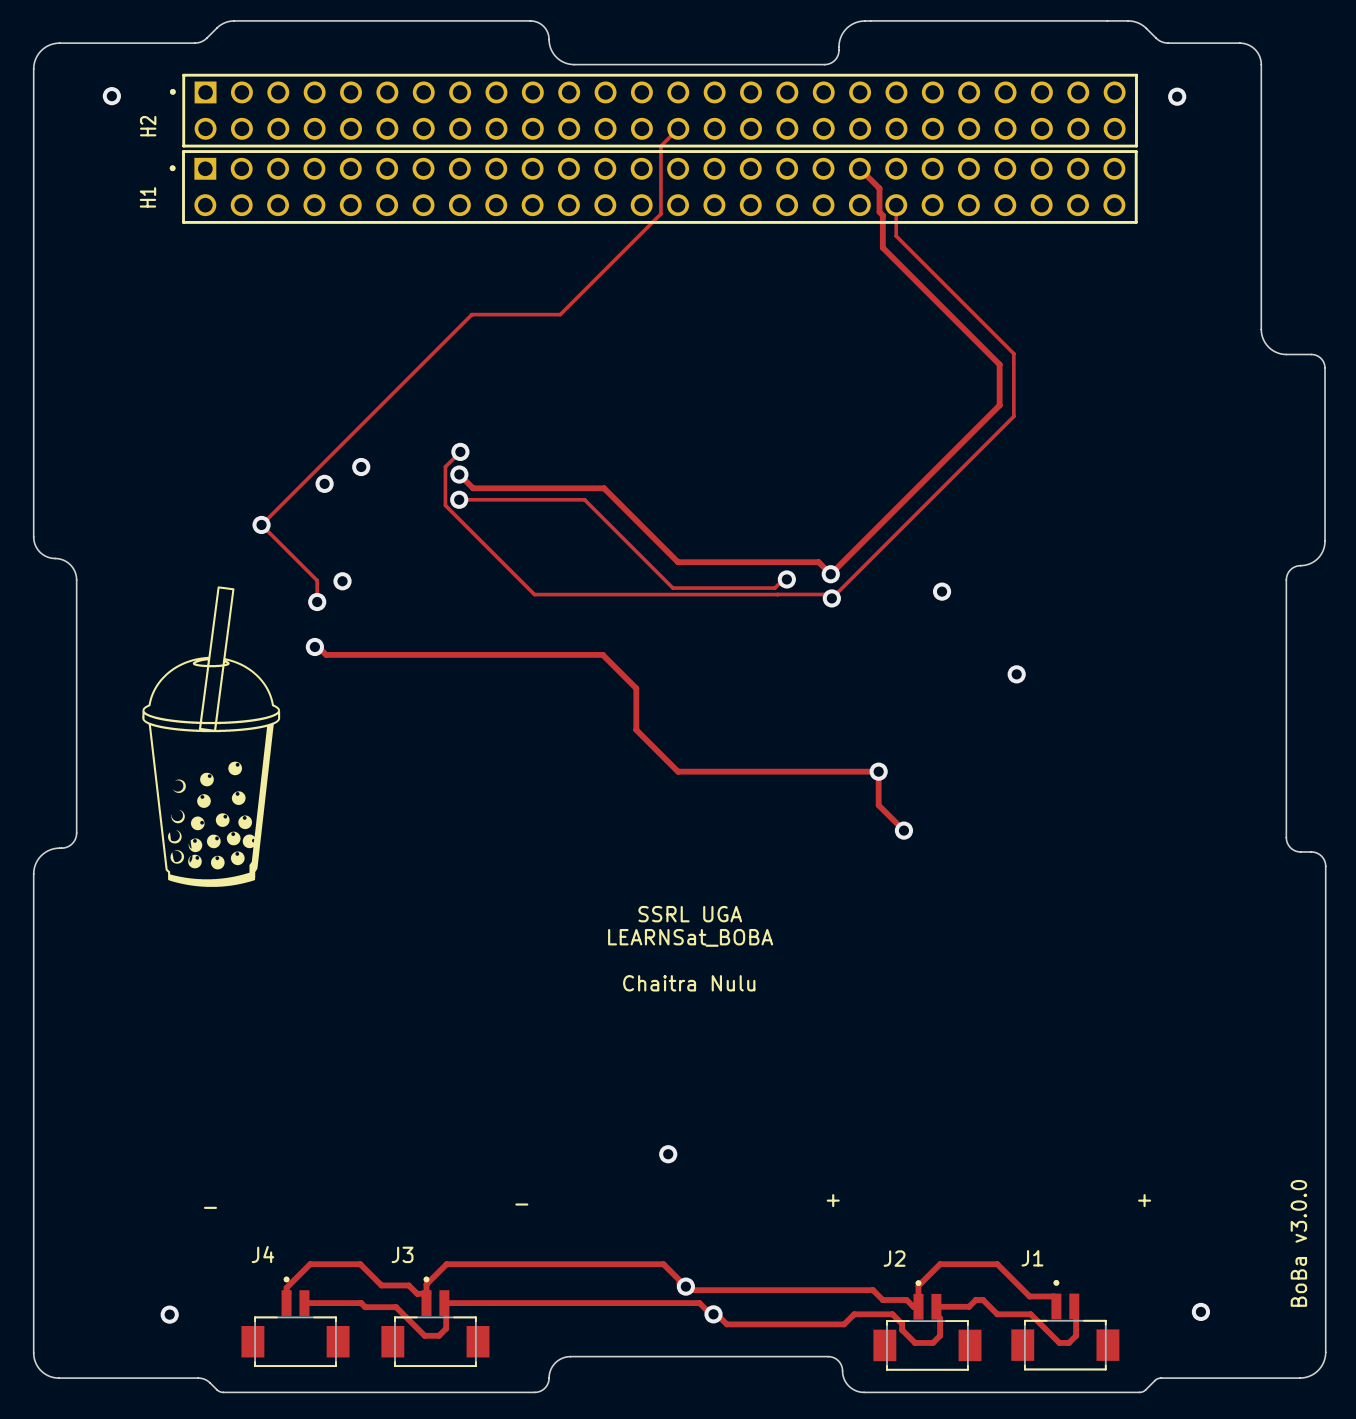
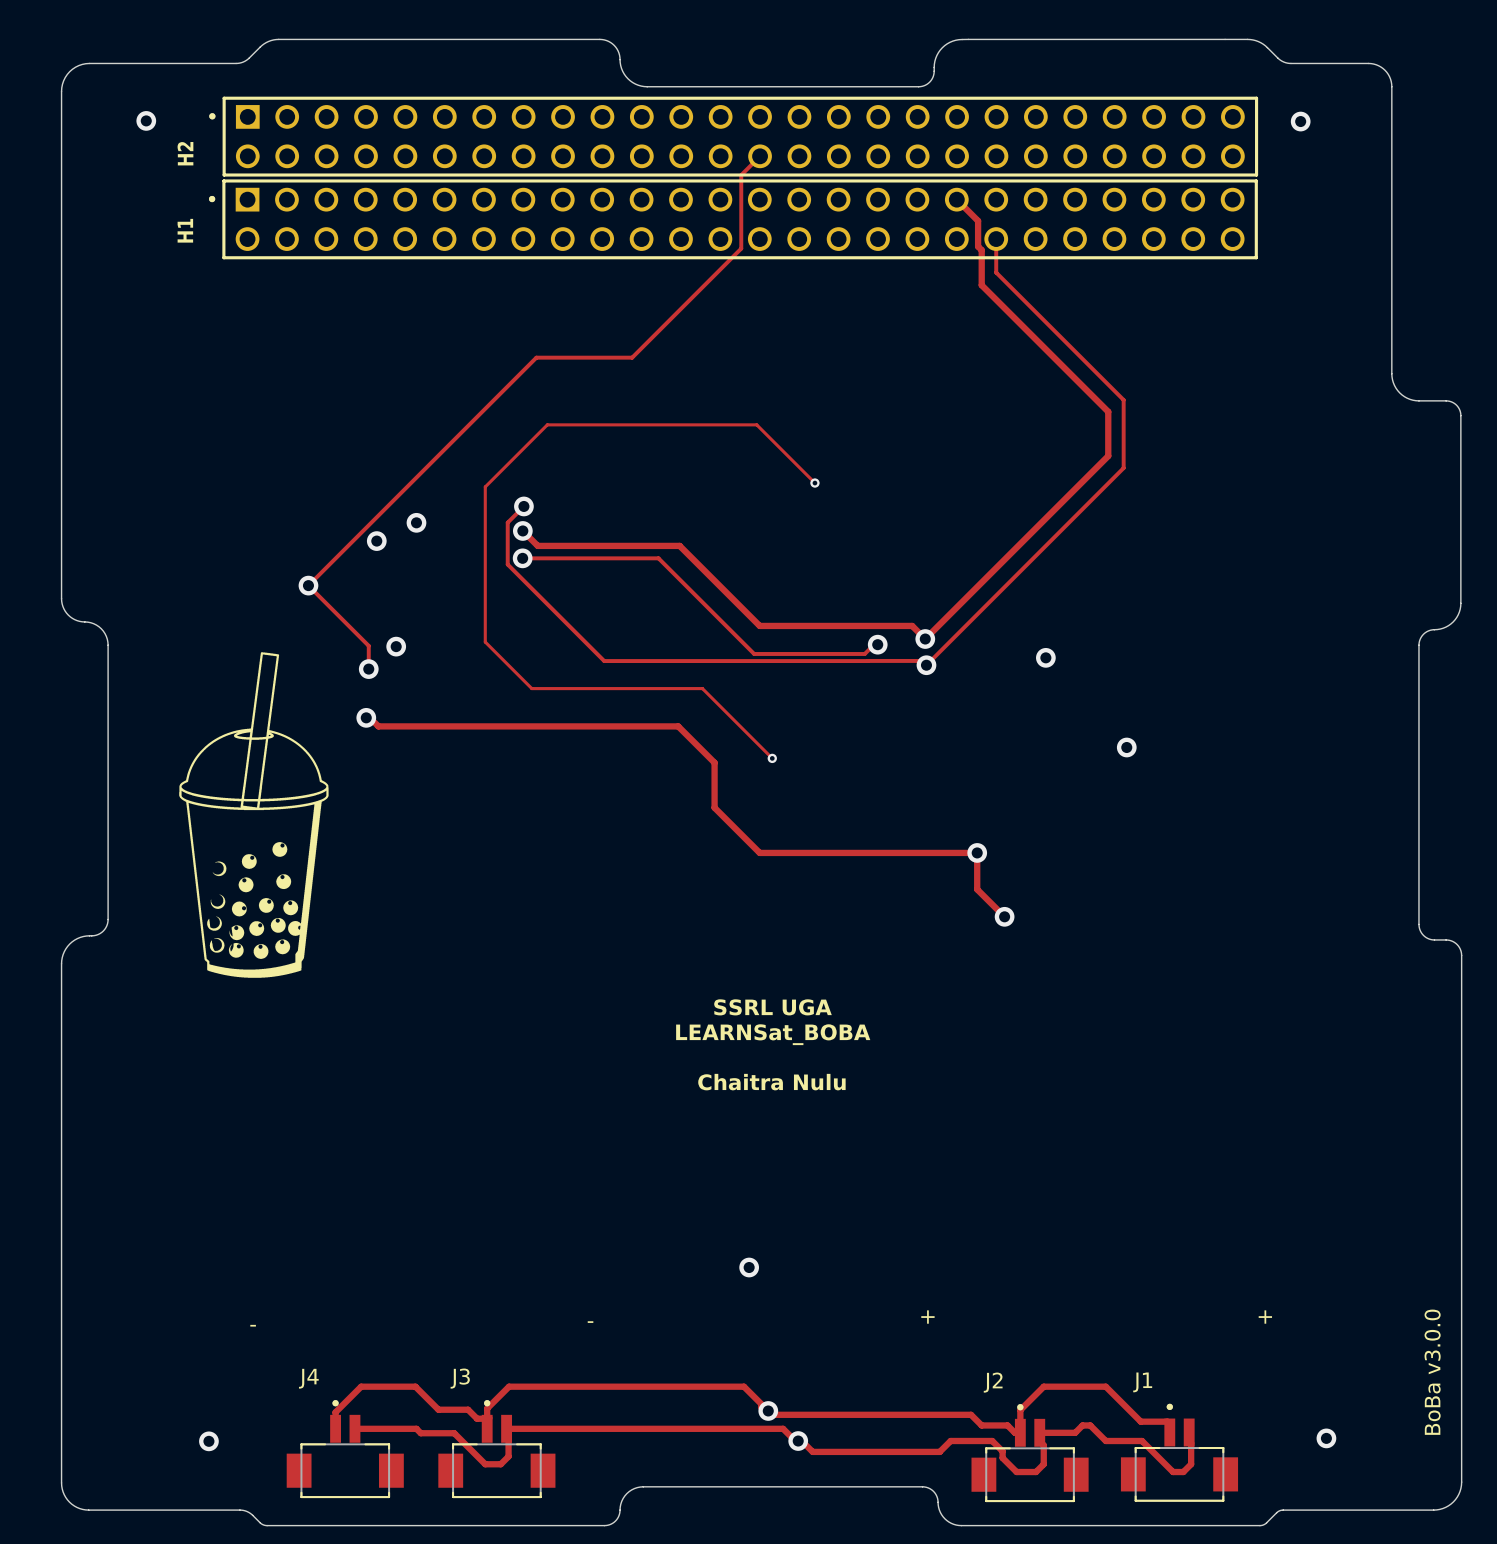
track: none -> (814, 483) (756, 424) (547, 424) (485, 486) (485, 642) (531, 688) (702, 688) (772, 758)
via: none -> (814, 483)
via: none -> (772, 758)

